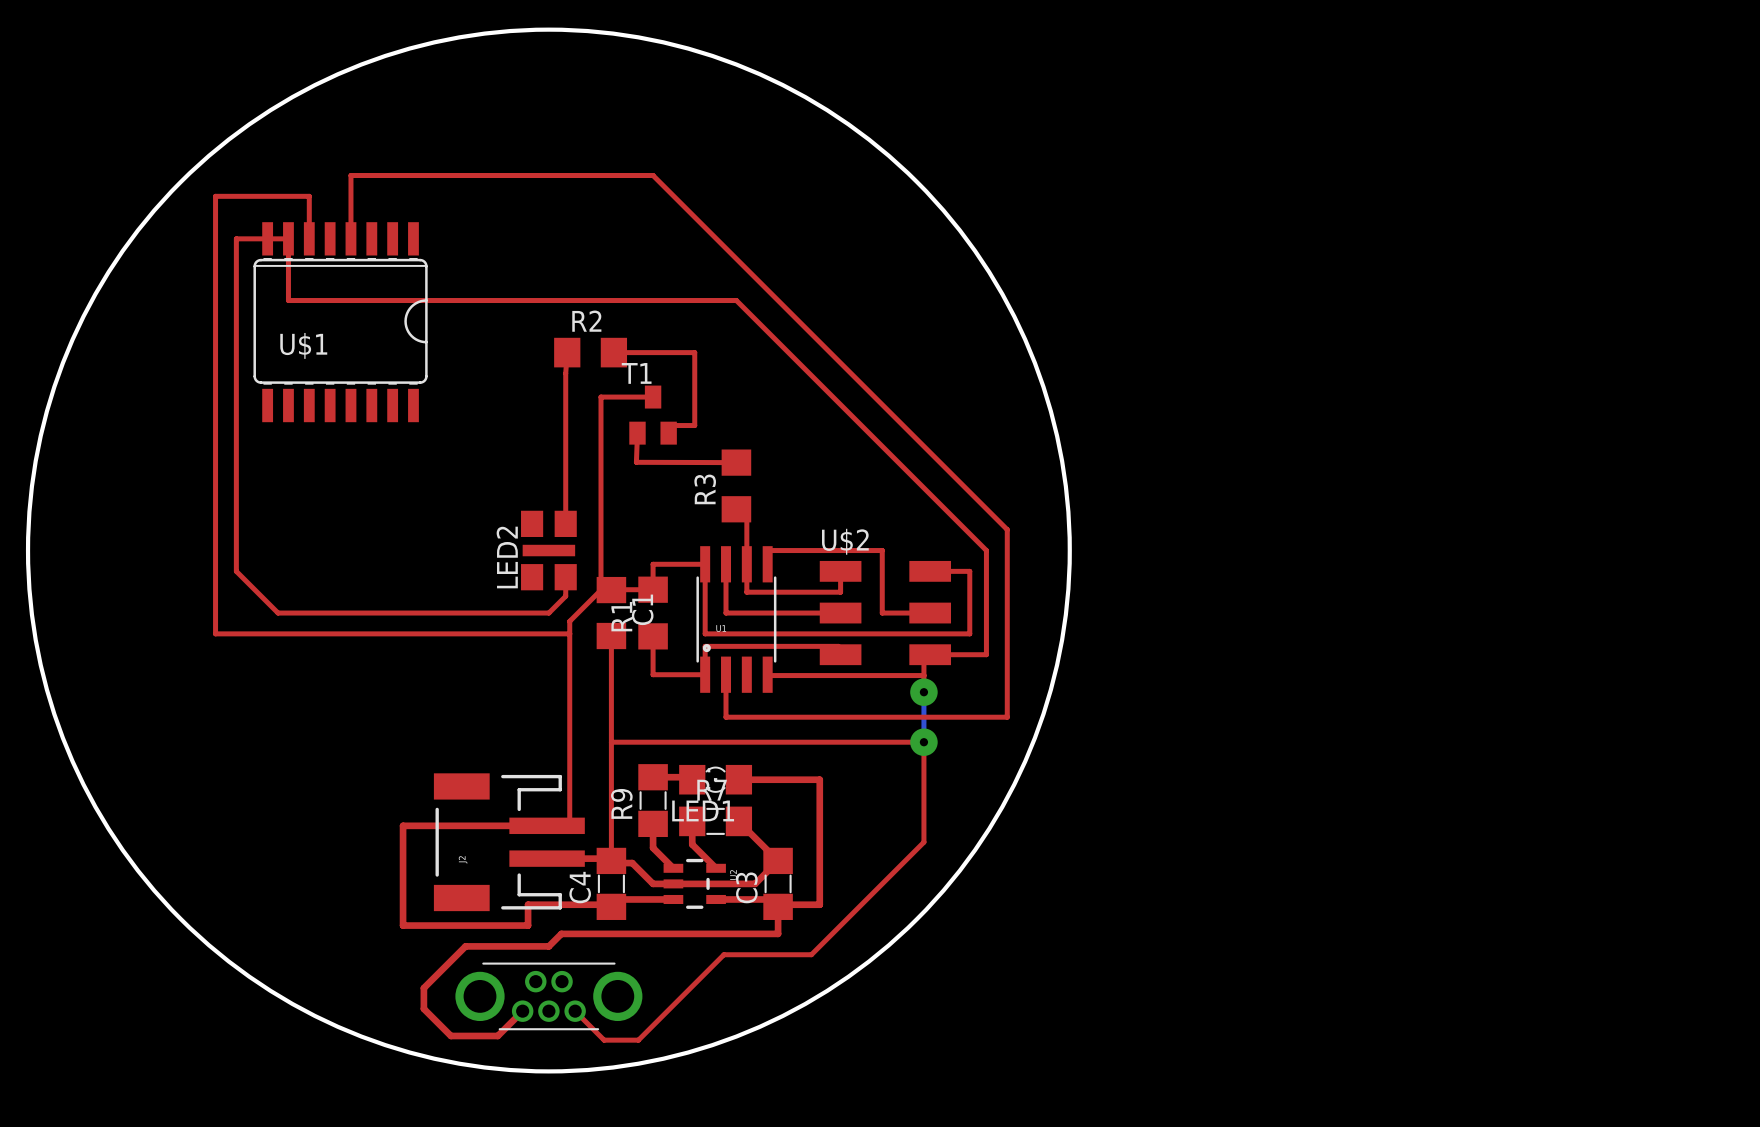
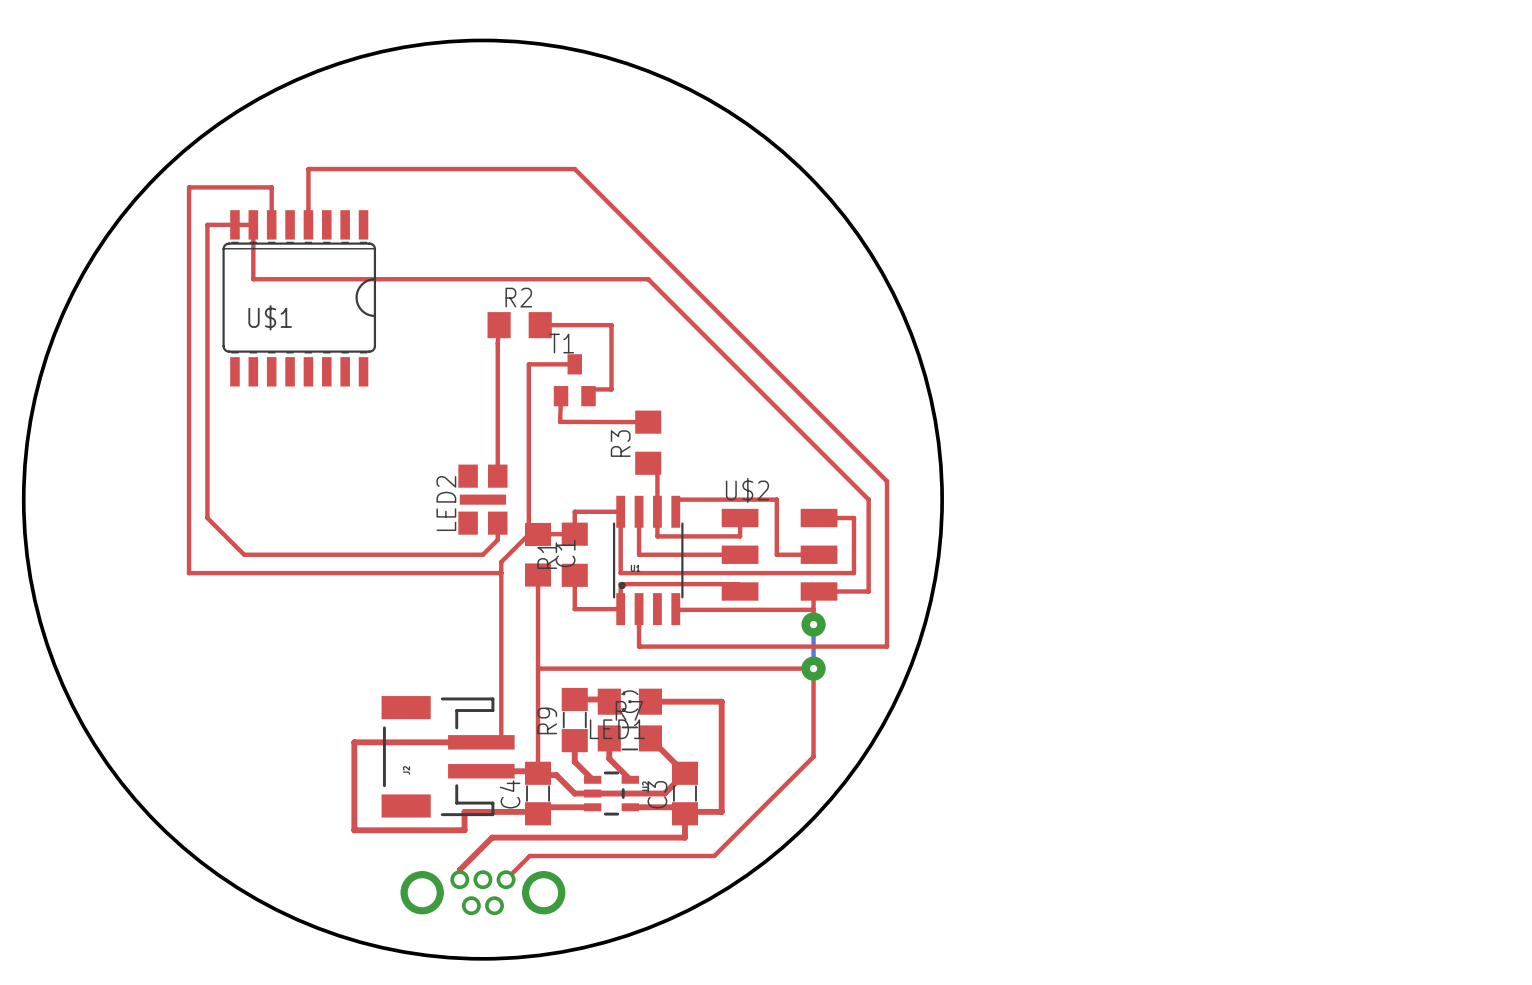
top track: (561, 933) (548, 946) (465, 946) (423, 988) (423, 1008) (450, 1035) (497, 1035) (522, 1011) -> (493, 837) (459, 869) (459, 879)
top track: (723, 954) (638, 1040) (604, 1040) (575, 1011) -> (637, 855) (529, 855) (506, 879)
part side: top (548, 996) -> bottom (482, 892)

